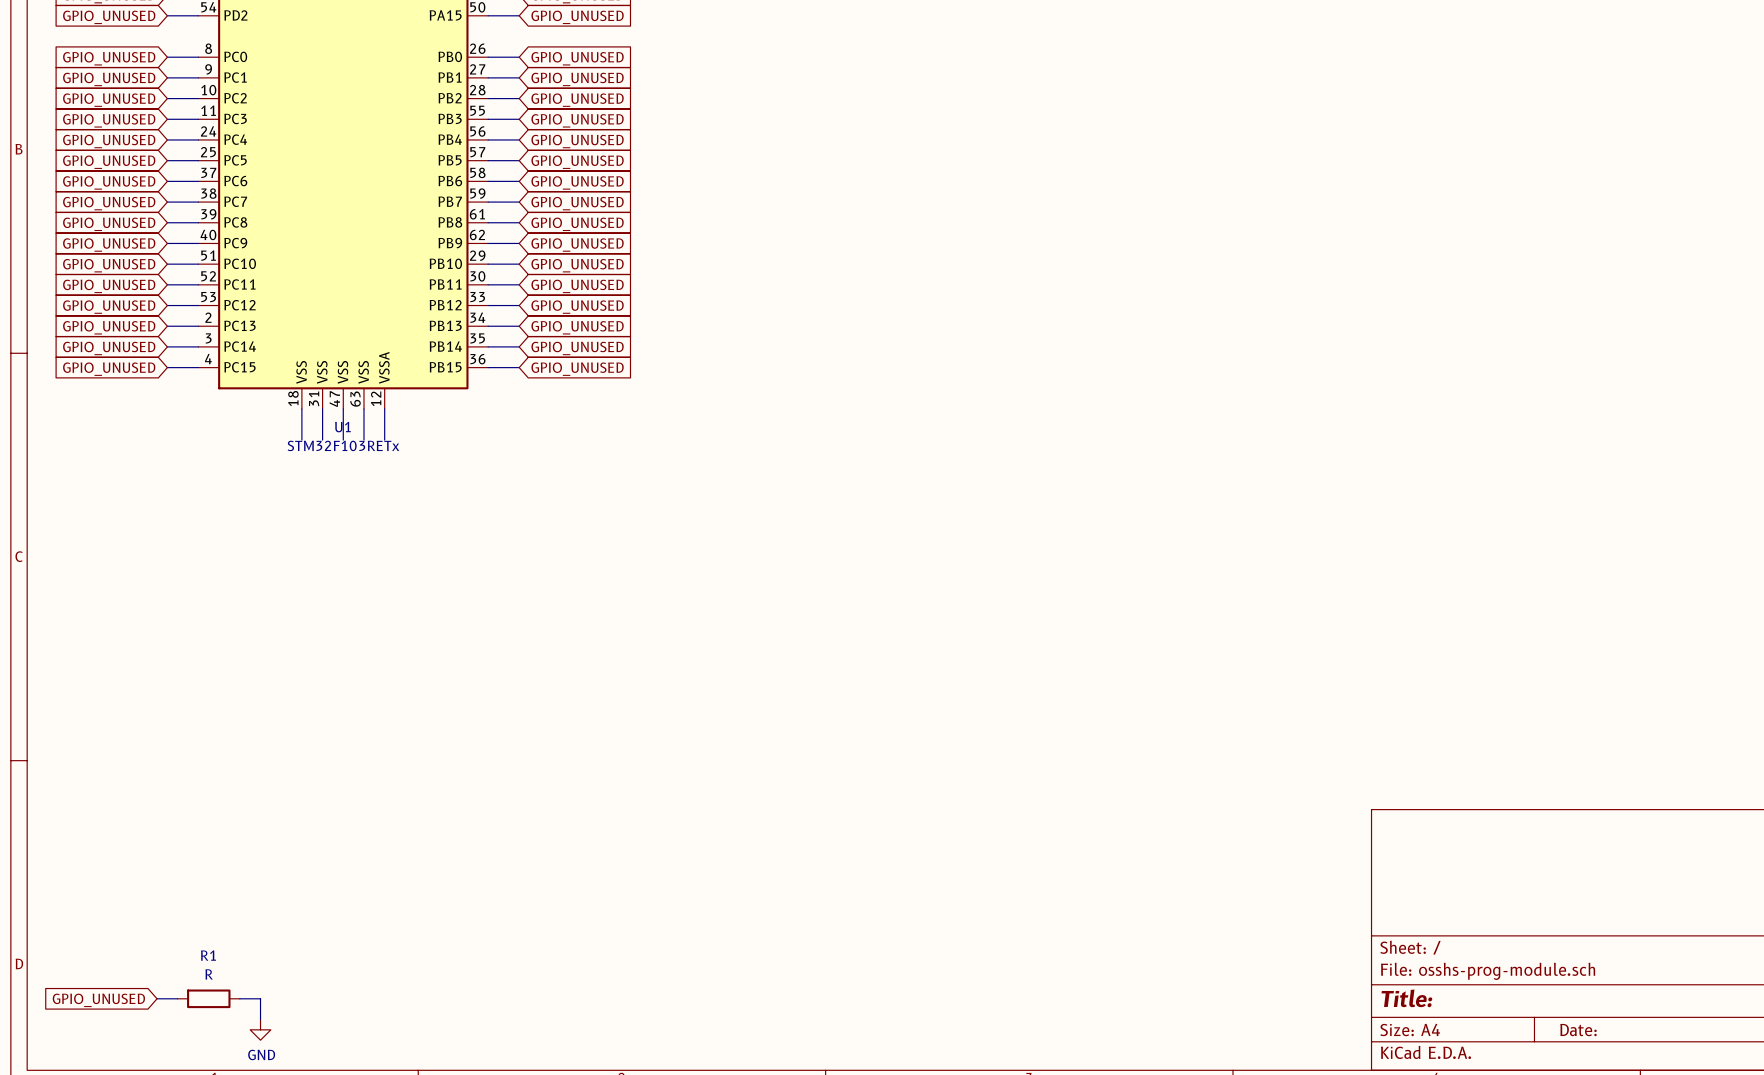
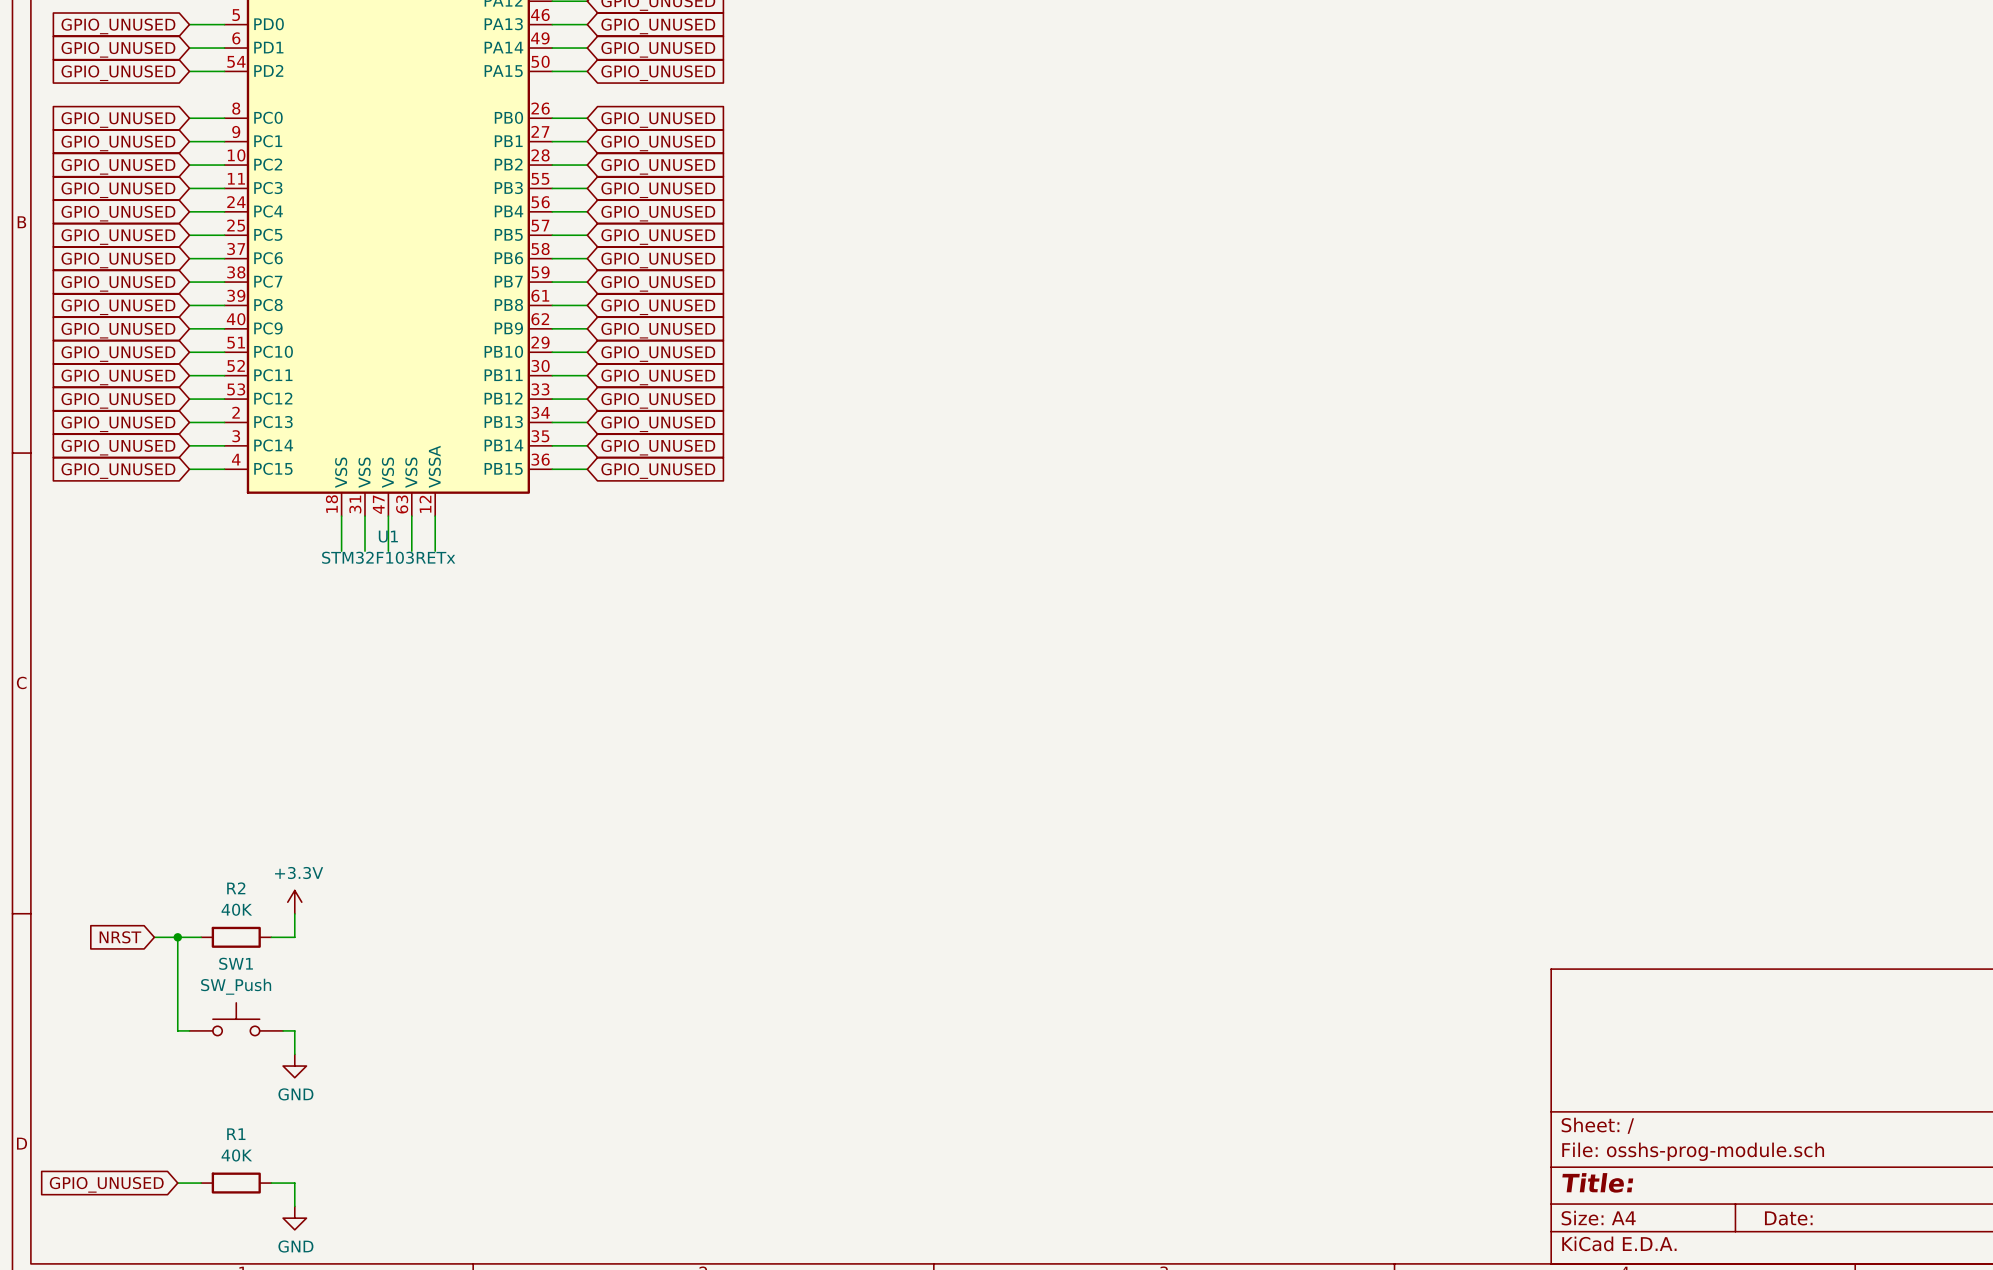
power symbol: none -> +3.3V (294, 902)
wire: none -> (294, 913) (294, 937) (271, 937)
global label: none -> NRST (120, 937)
wire: none -> (154, 937) (201, 937)
wire: none -> (177, 937) (177, 1030) (189, 1030)
junction: none -> (177, 937)
R2: none -> 40K (236, 937)
SW1: none -> SW_Push (236, 1019)
wire: none -> (283, 1030) (294, 1030) (294, 1054)
power symbol: none -> GND (294, 1066)
R1 value: R (209, 974) -> 40K (236, 1155)

